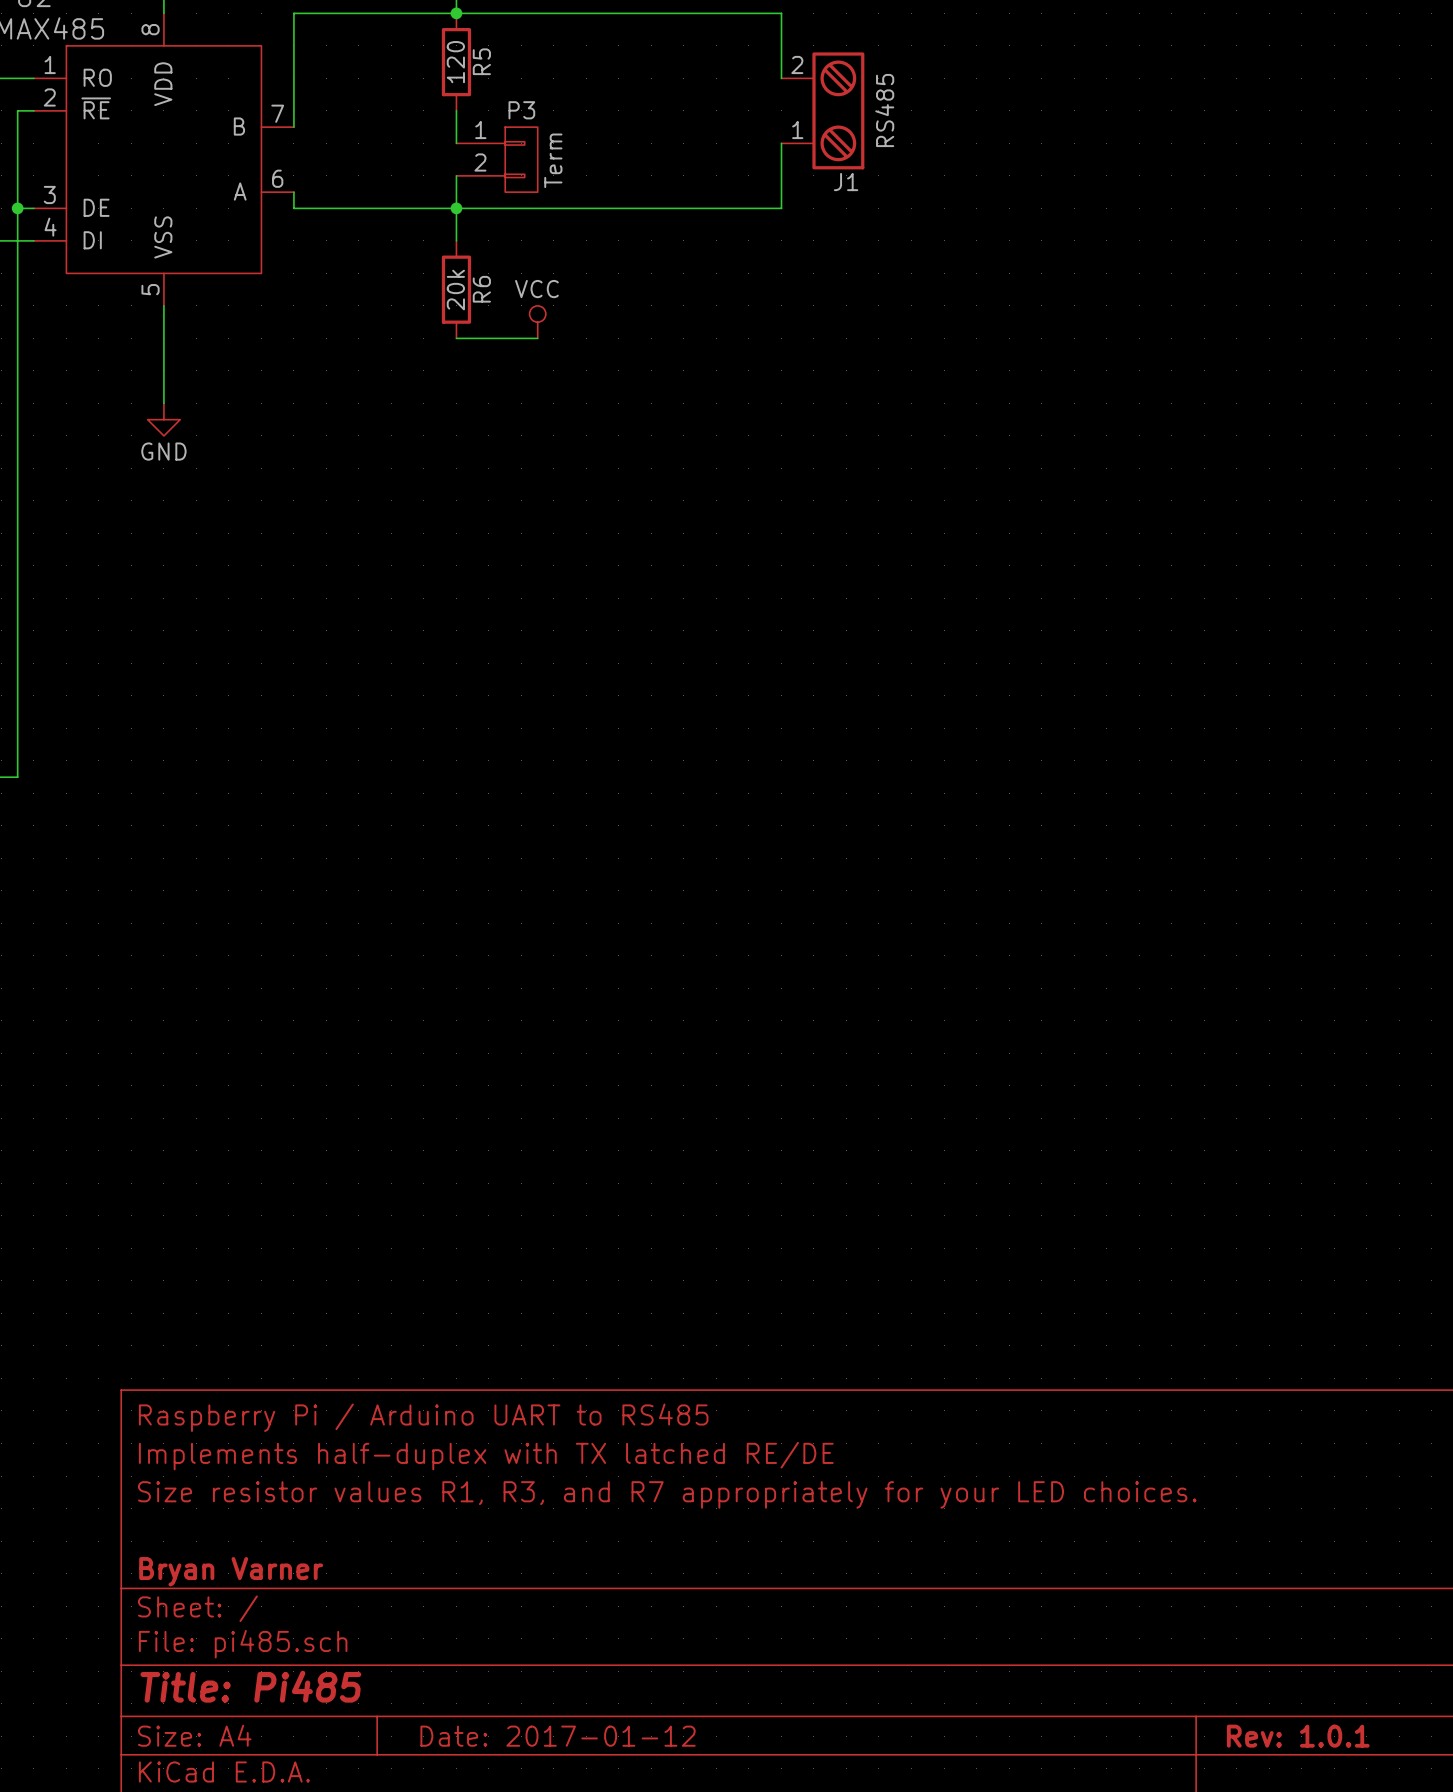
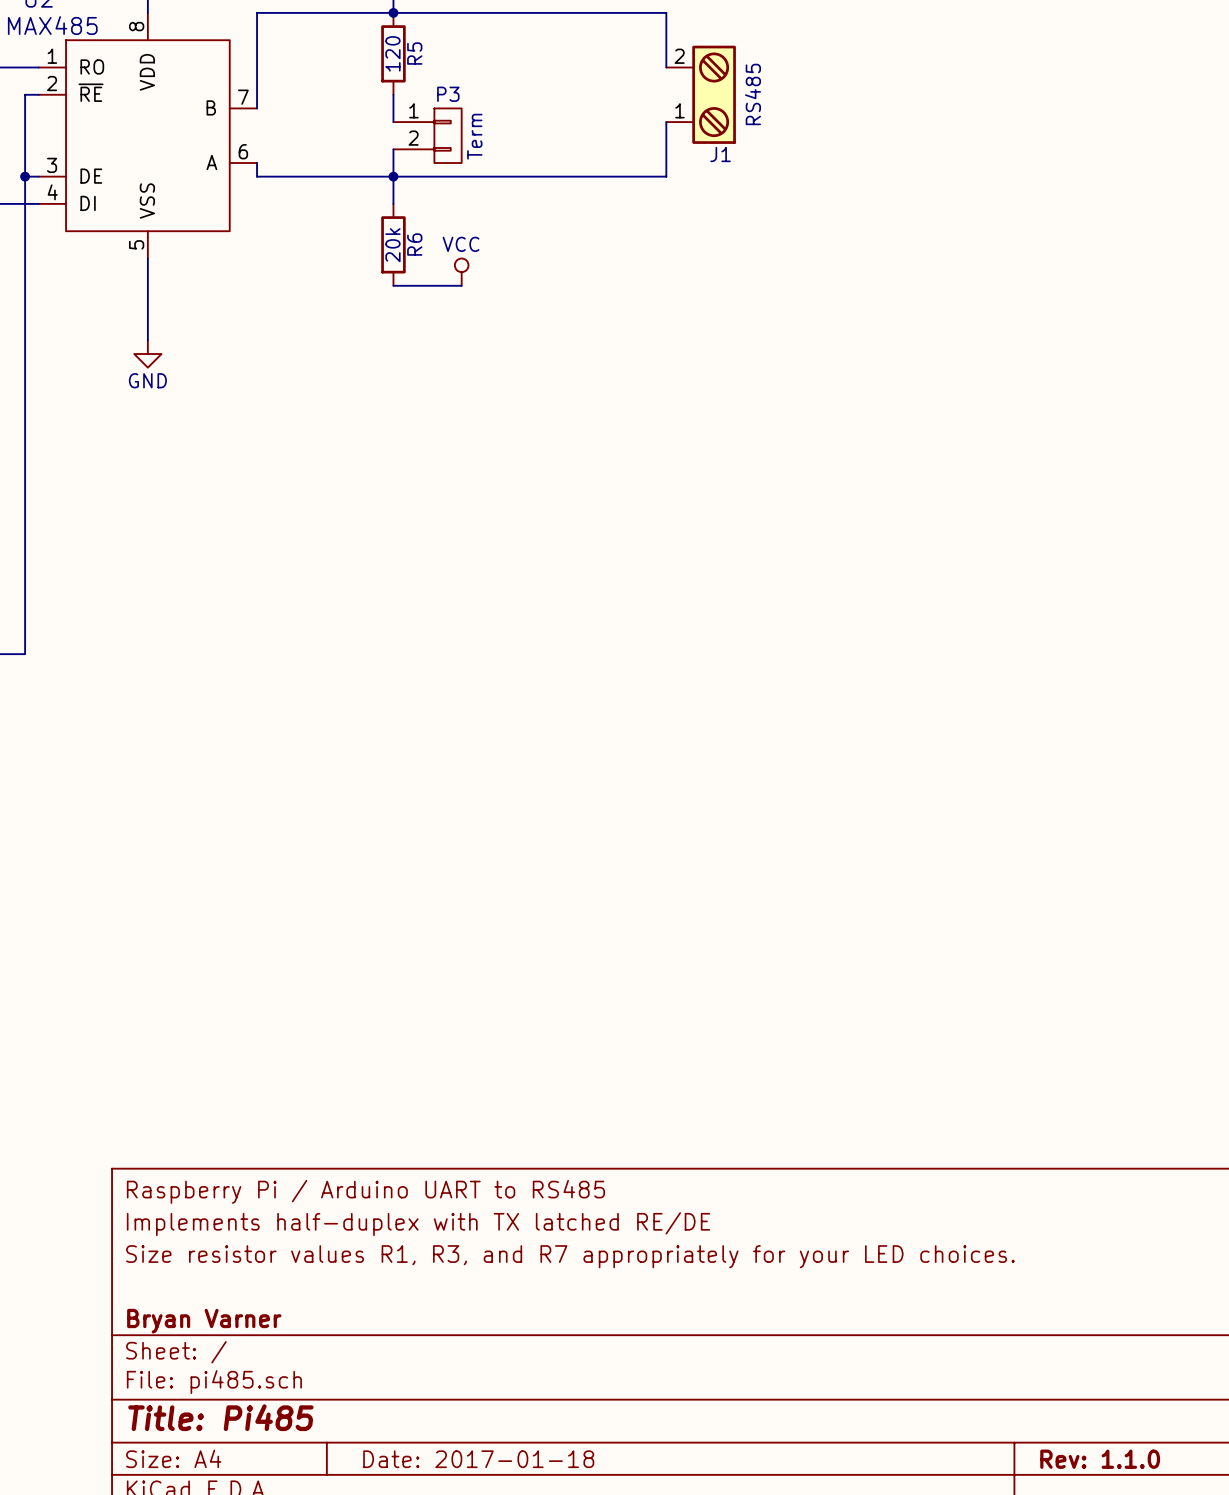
title block: Date: 2017-01-12 (558, 1736) -> Date: 2017-01-18 (478, 1459)
title block: Rev: 1.0.1 (1298, 1736) -> Rev: 1.1.0 (1100, 1459)

